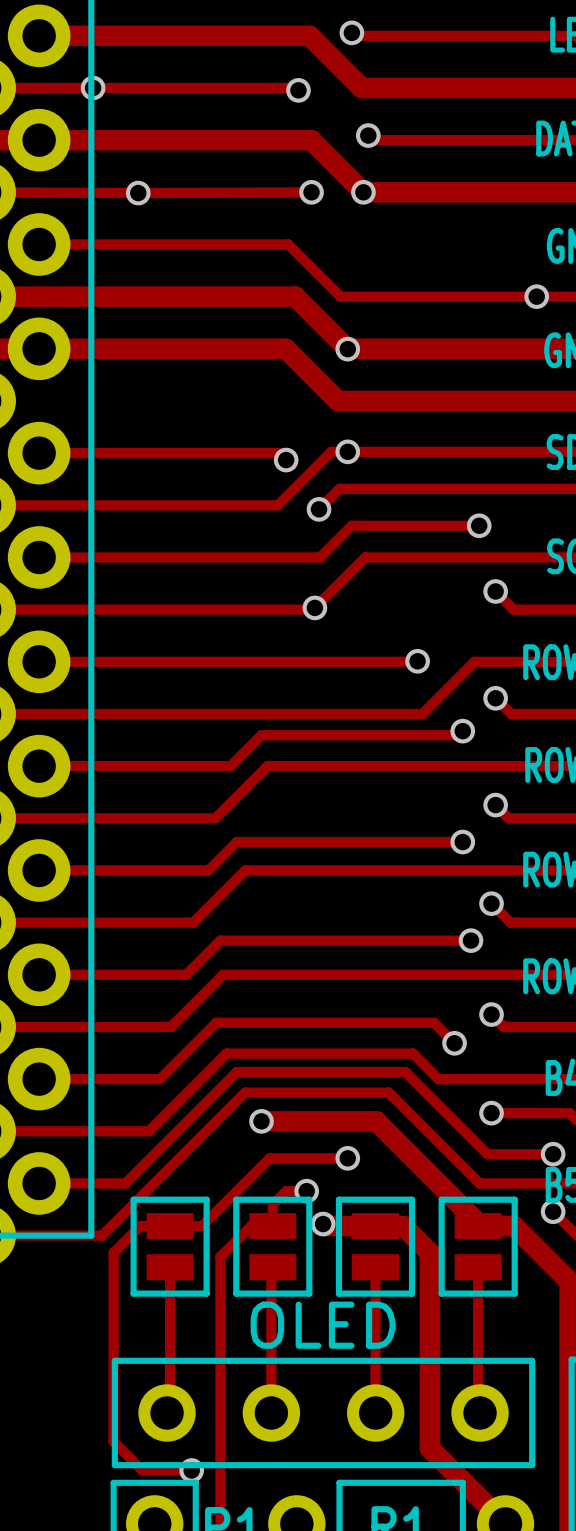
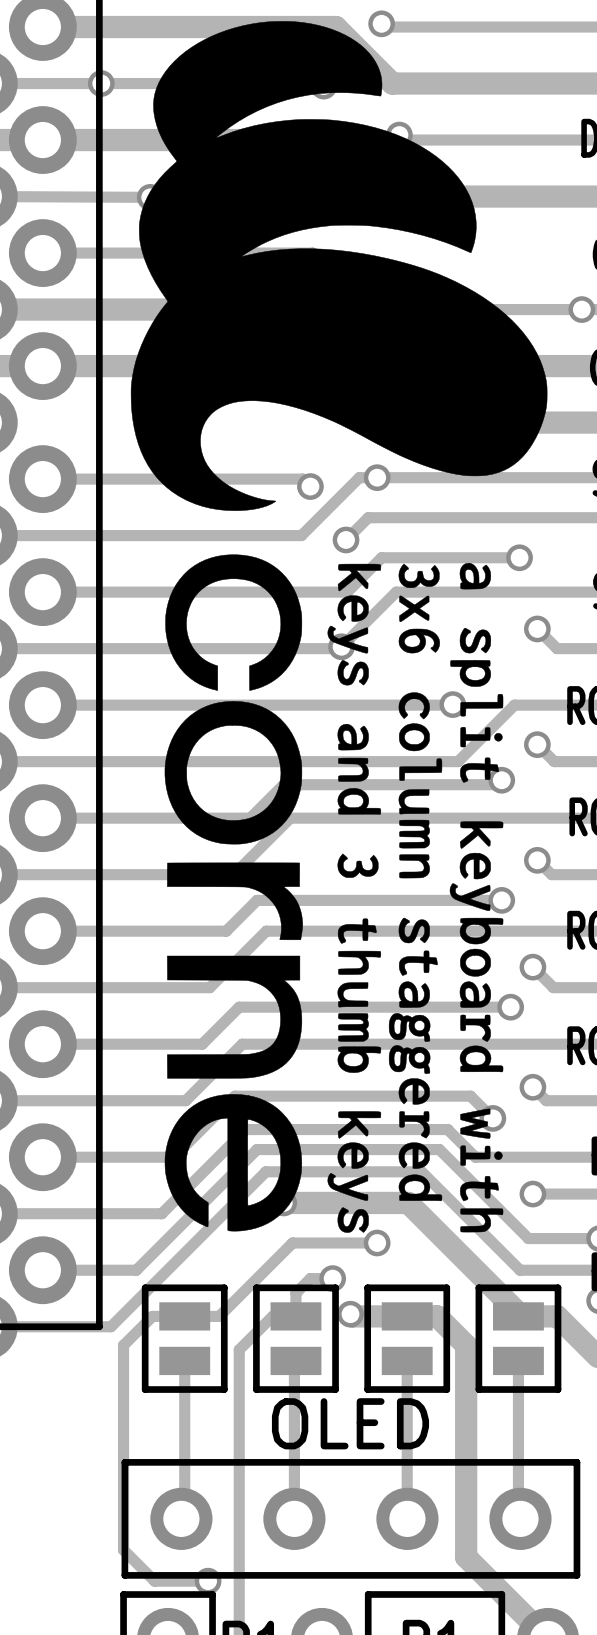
drawing: none -> [130, 21, 548, 1233]

